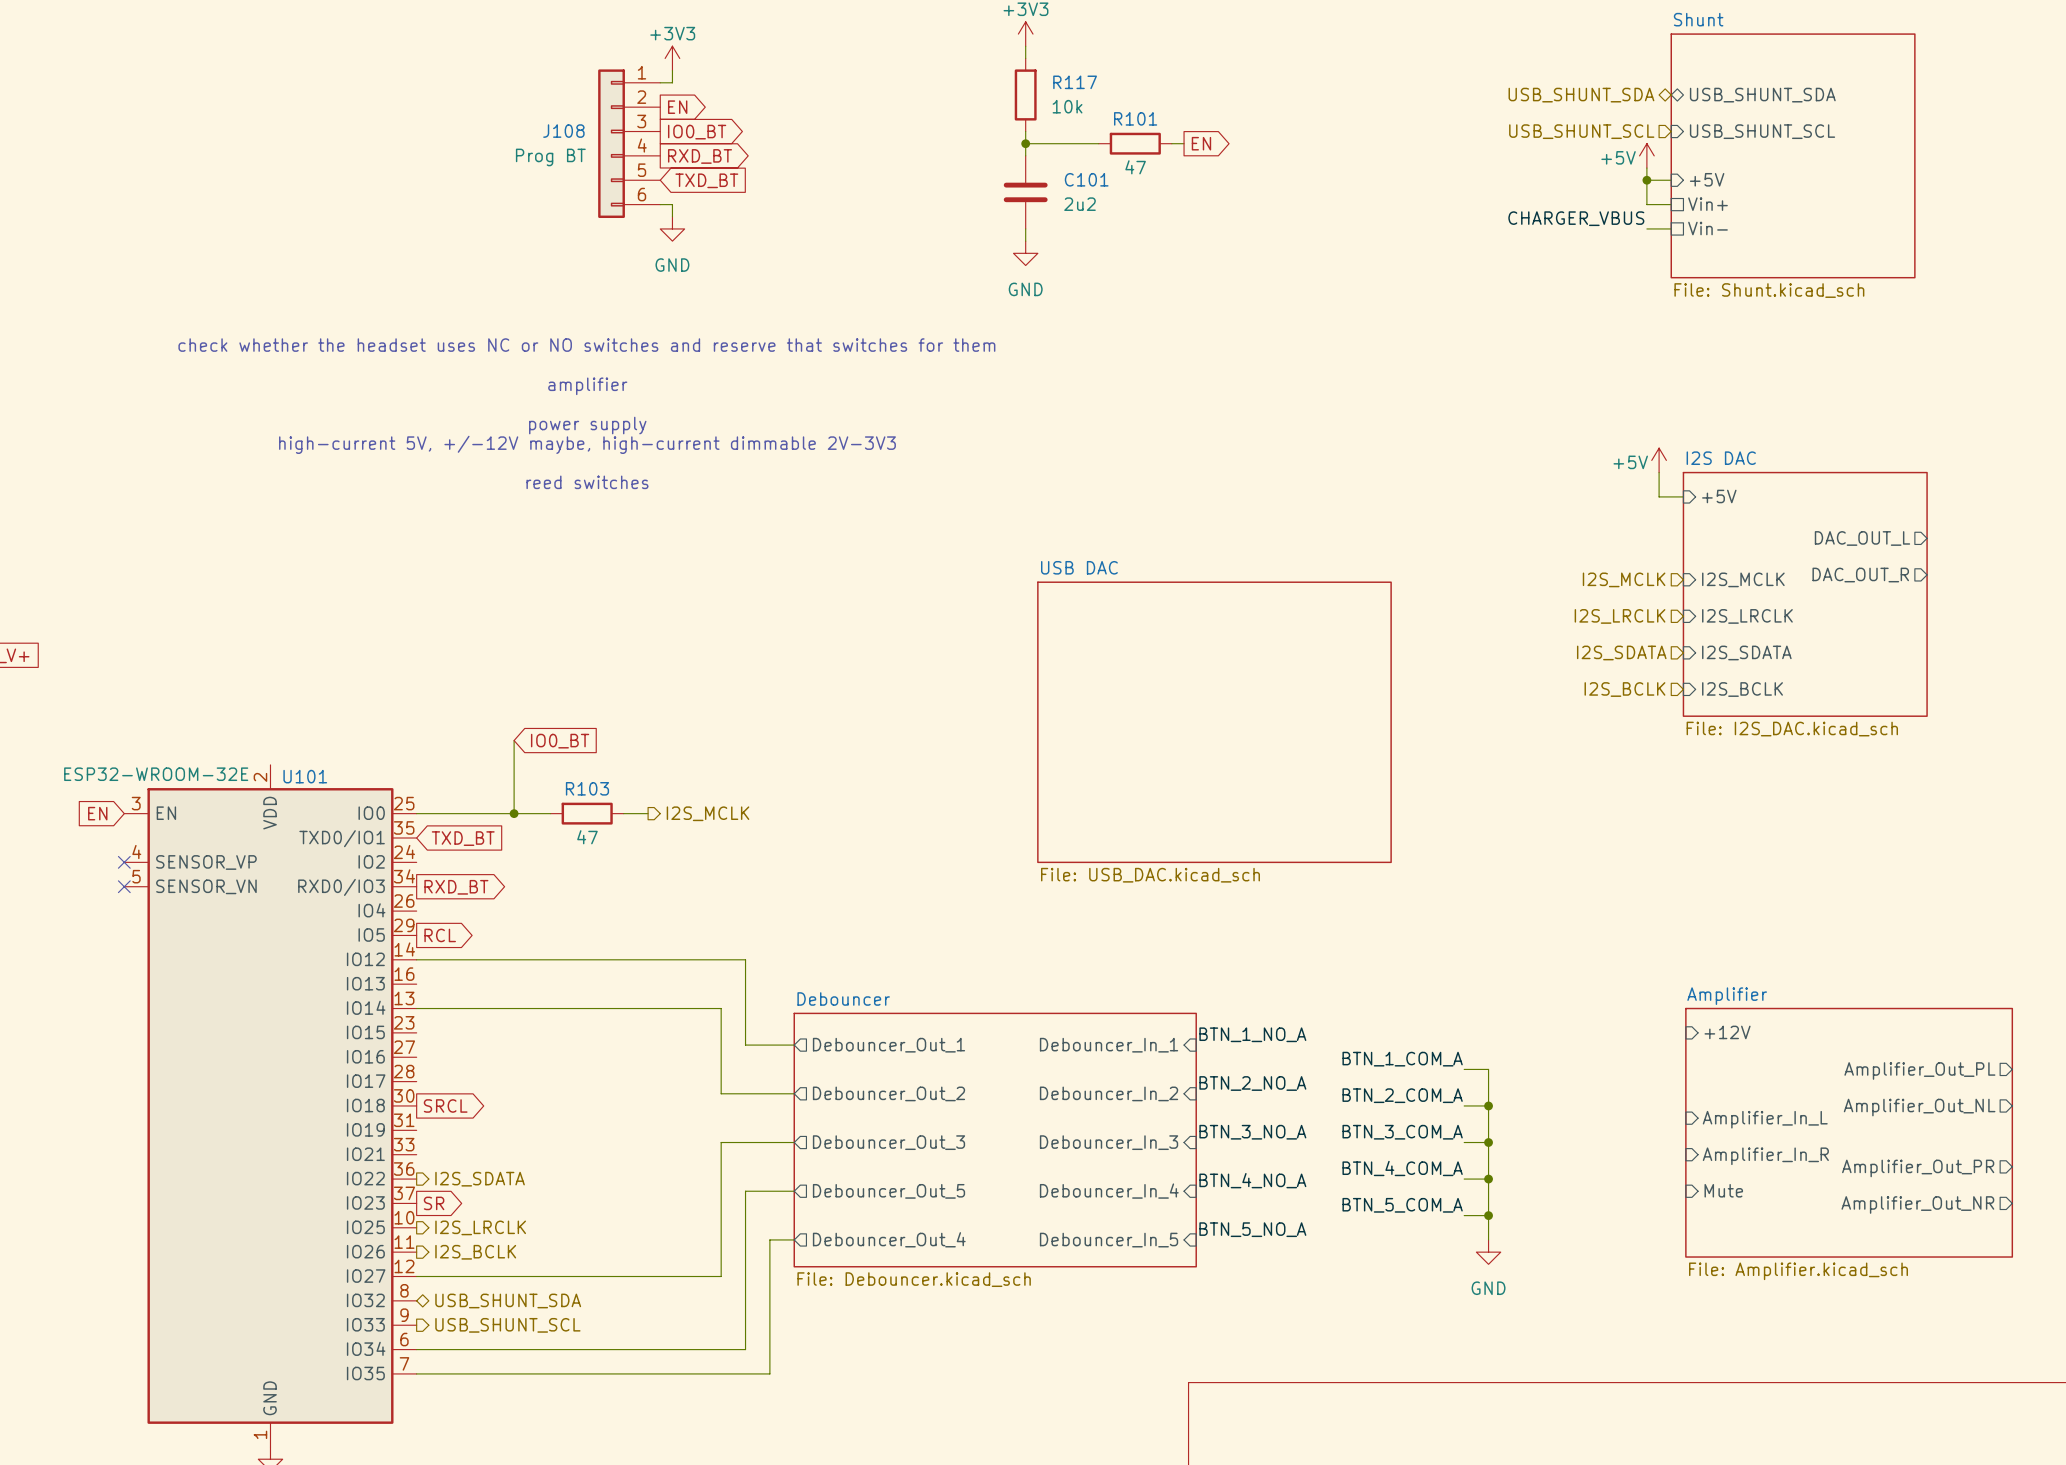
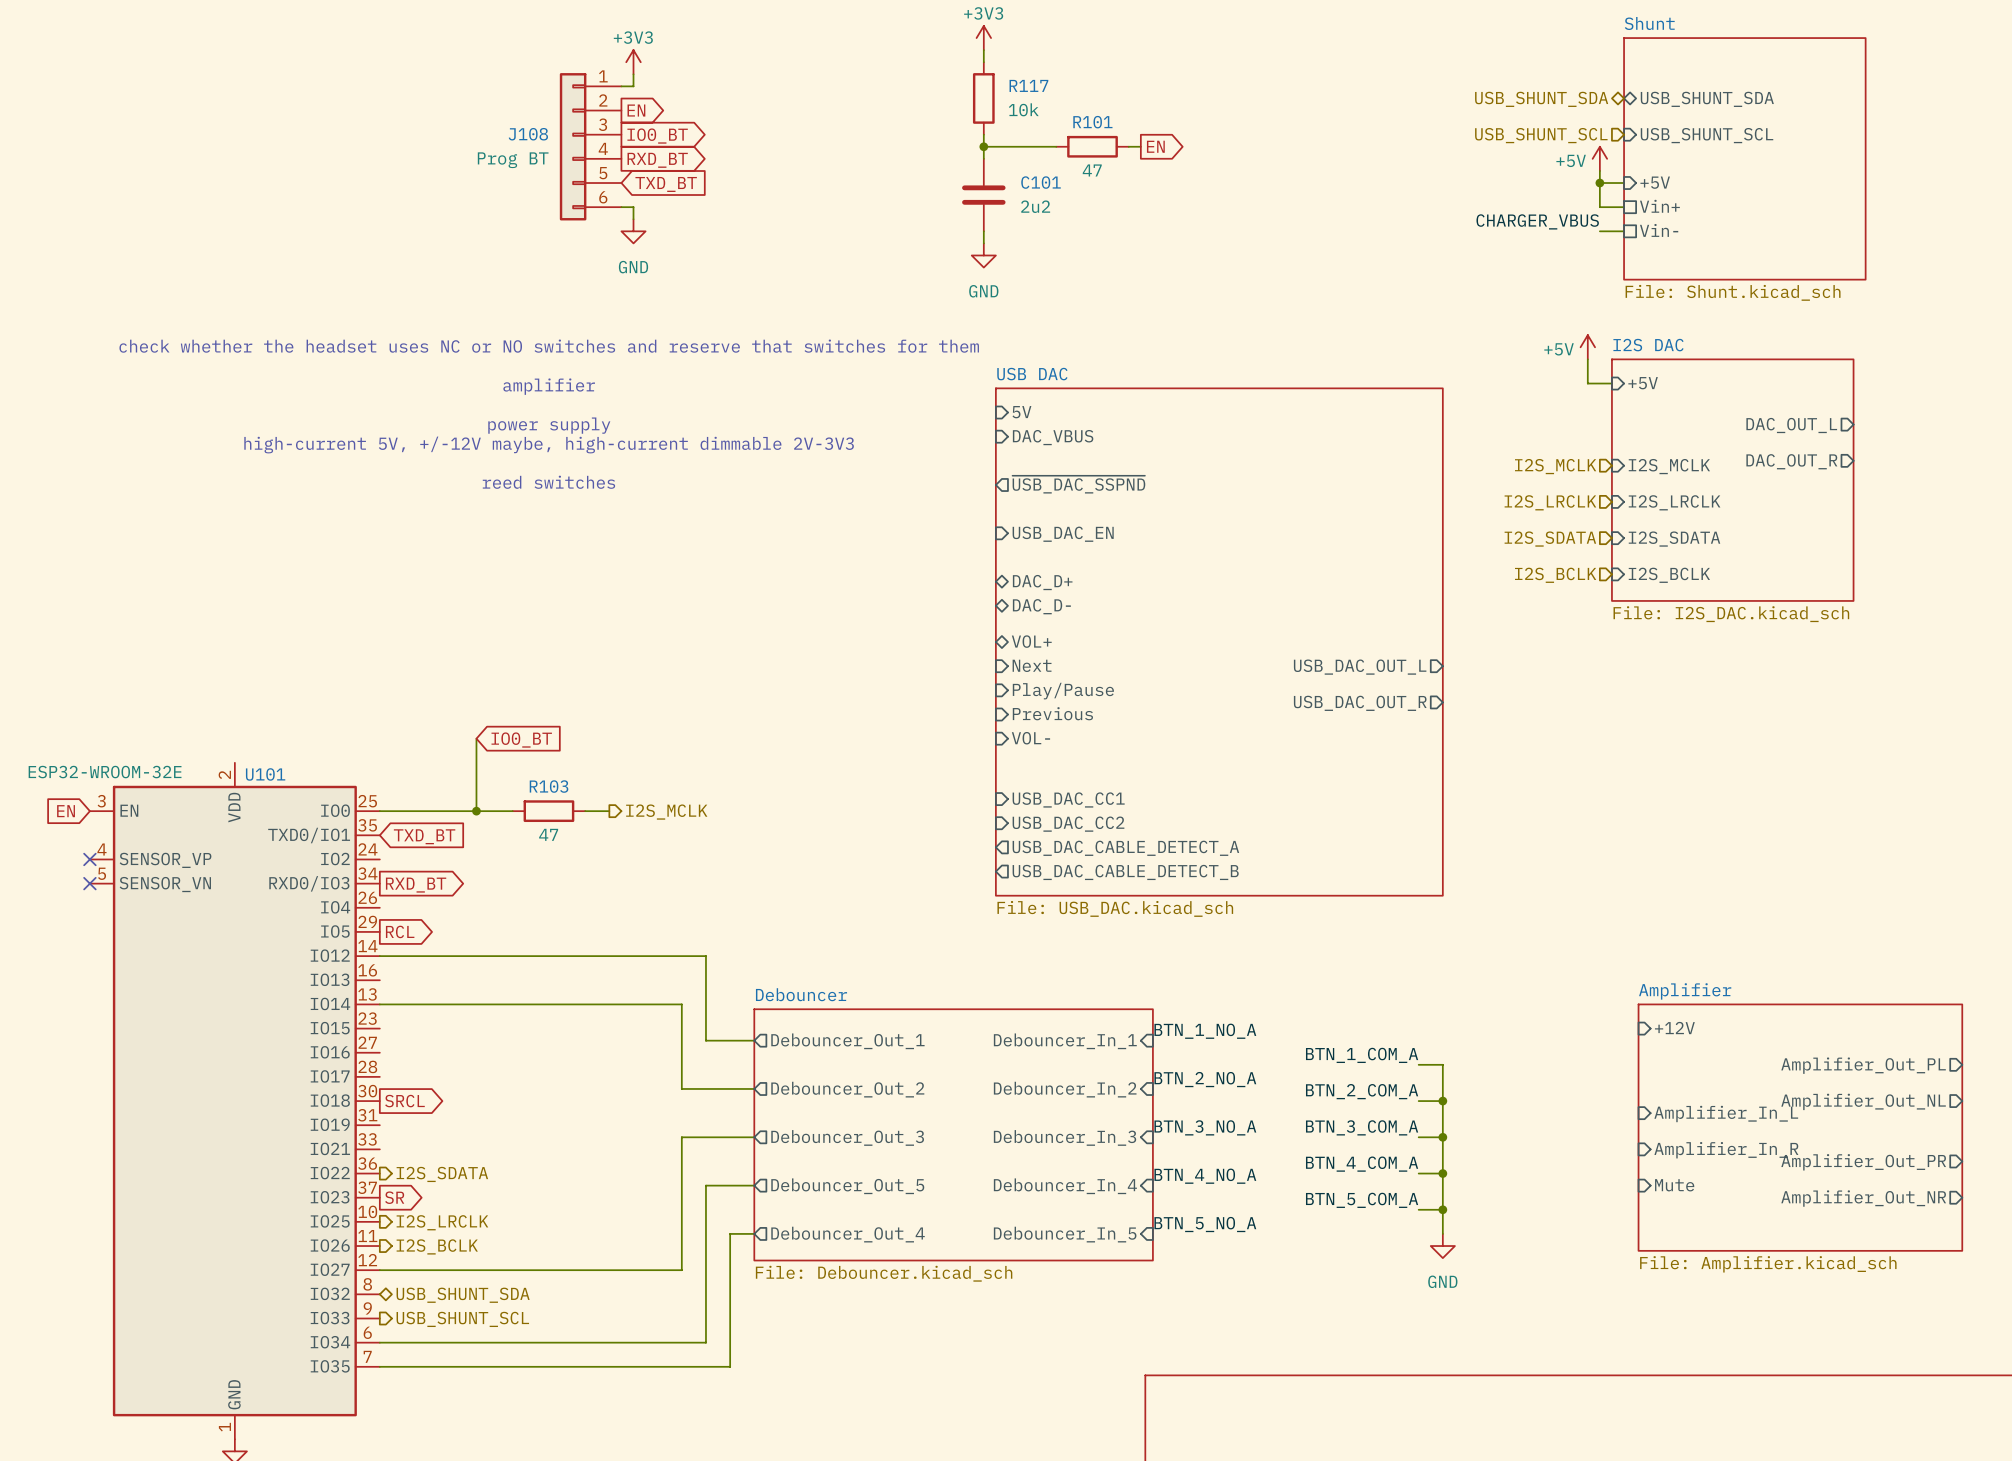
sheet pin: none -> 5V (1021, 412)
sheet pin: none -> DAC_VBUS (1053, 437)
power symbol position: +5V (1659, 460) -> +5V (1587, 347)
wire: (1659, 472) (1659, 496) (1683, 496) -> (1587, 359) (1587, 383) (1611, 383)
sheet pin: none -> ~{USB_DAC_SSPND} (1078, 484)
sheet pin position: +5V (1719, 496) -> +5V (1643, 383)
sheet pin: none -> USB_DAC_EN (1063, 534)
sheet pin position: DAC_OUT_L (1862, 538) -> DAC_OUT_L (1791, 425)
sheet pin position: DAC_OUT_R (1860, 575) -> DAC_OUT_R (1791, 461)
hierarchical label position: I2S_MCLK (1624, 579) -> I2S_MCLK (1555, 466)
sheet pin position: I2S_MCLK (1743, 579) -> I2S_MCLK (1669, 466)
sheet pin: none -> DAC_D+ (1042, 582)
sheet I2S DAC position: (1805, 594) -> (1732, 480)
sheet pin: none -> DAC_D- (1041, 606)
hierarchical label position: I2S_LRCLK (1620, 616) -> I2S_LRCLK (1550, 502)
sheet pin position: I2S_LRCLK (1747, 616) -> I2S_LRCLK (1674, 502)
sheet pin: none -> VOL+ (1031, 641)
sheet USB DAC: none -> File: USB_DAC.kicad_sch (1219, 642)
hierarchical label position: I2S_SDATA (1621, 652) -> I2S_SDATA (1550, 539)
sheet pin position: I2S_SDATA (1746, 652) -> I2S_SDATA (1674, 539)
sheet pin: none -> Next (1032, 665)
sheet pin: none -> USB_DAC_OUT_L (1360, 667)
hierarchical label position: I2S_BCLK (1624, 689) -> I2S_BCLK (1555, 575)
sheet pin position: I2S_BCLK (1742, 689) -> I2S_BCLK (1669, 575)
sheet pin: none -> Play/Pause (1063, 691)
sheet pin: none -> USB_DAC_OUT_R (1360, 703)
sheet pin: none -> Previous (1052, 713)
sheet USB DAC: File: USB_DAC.kicad_sch (1214, 722) -> none
sheet pin: none -> VOL- (1030, 738)
sheet pin: none -> USB_DAC_CC1 (1068, 799)
sheet pin: none -> USB_DAC_CC2 (1068, 824)
sheet pin: none -> USB_DAC_CABLE_DETECT_A (1125, 848)
sheet pin: none -> USB_DAC_CABLE_DETECT_B (1125, 872)

